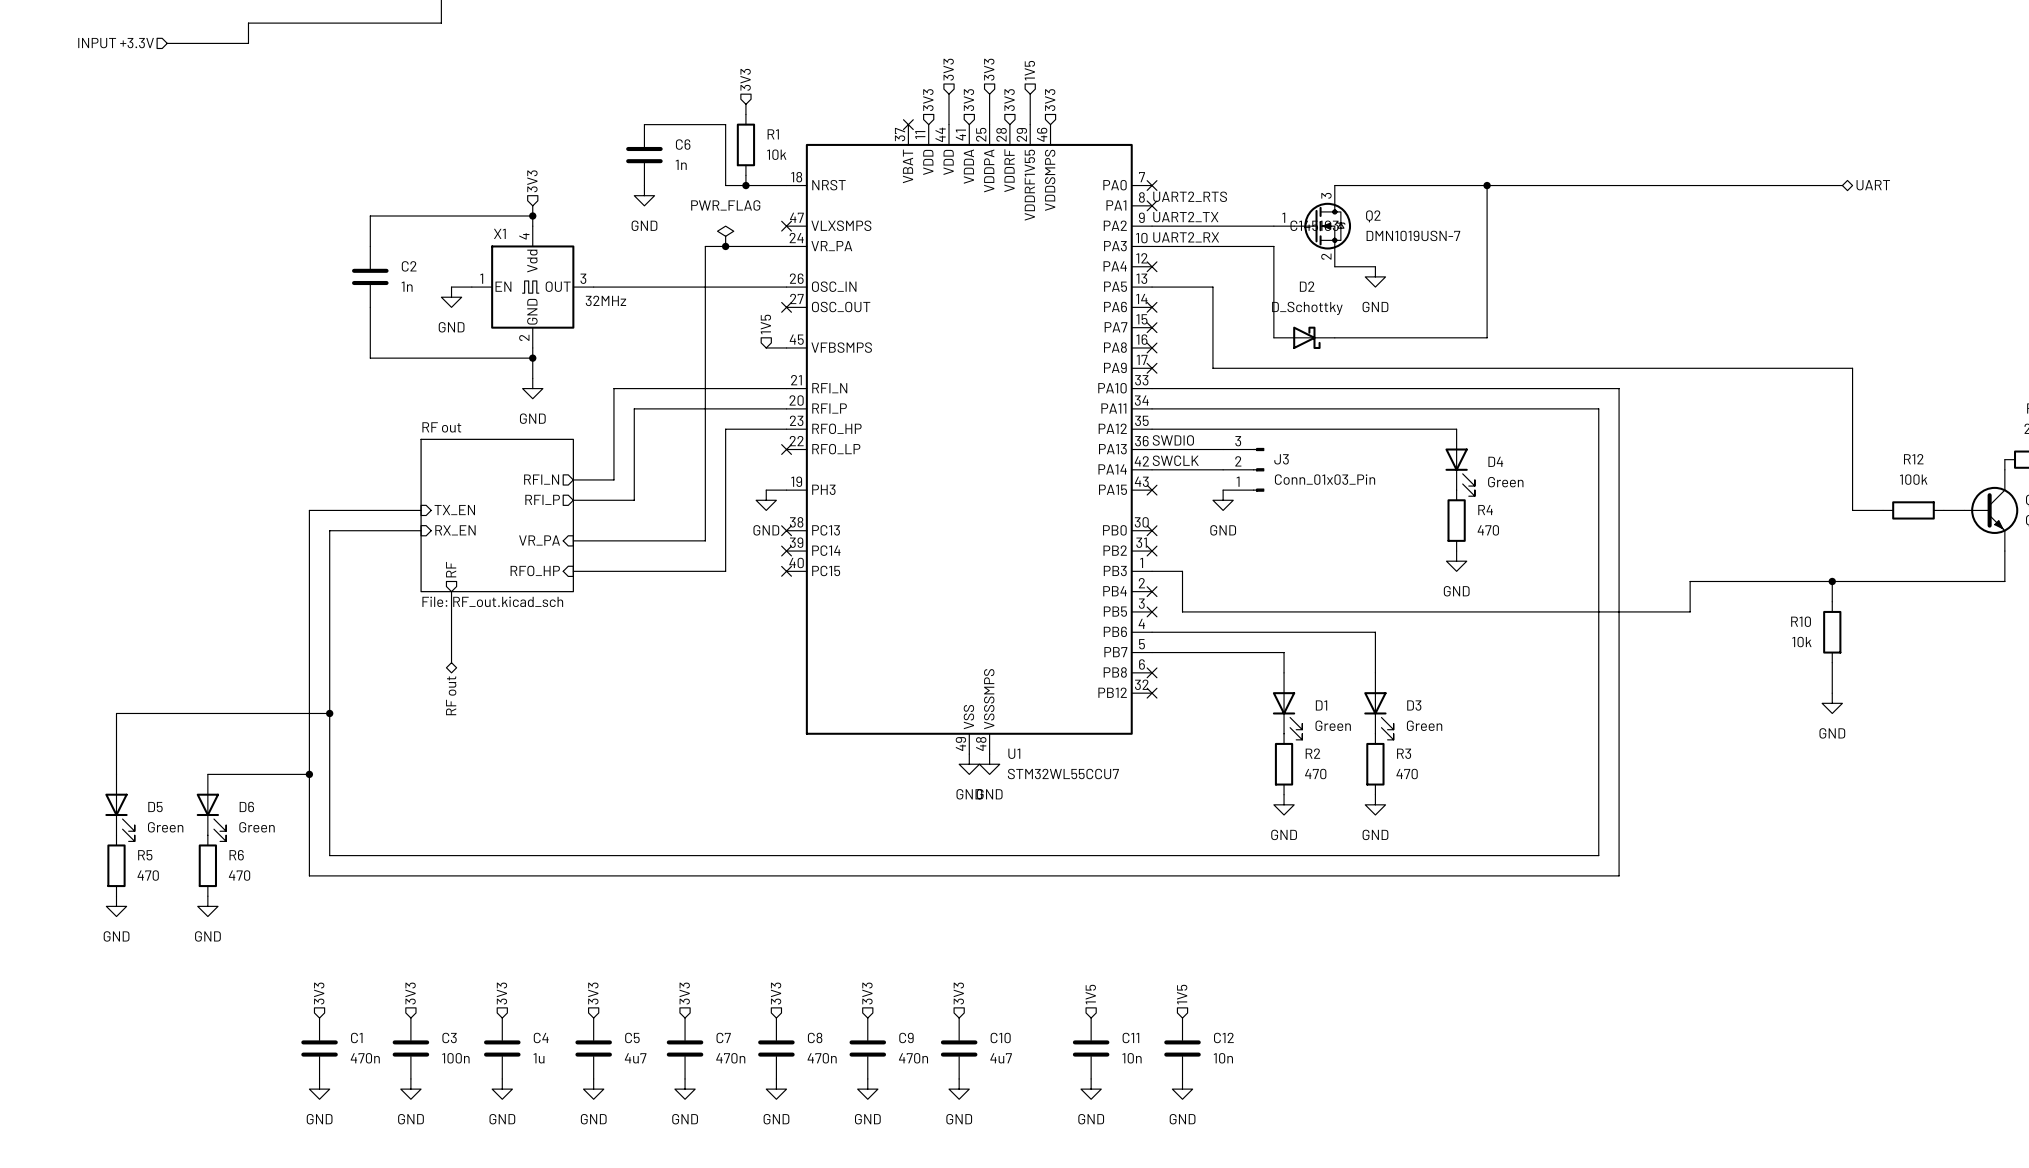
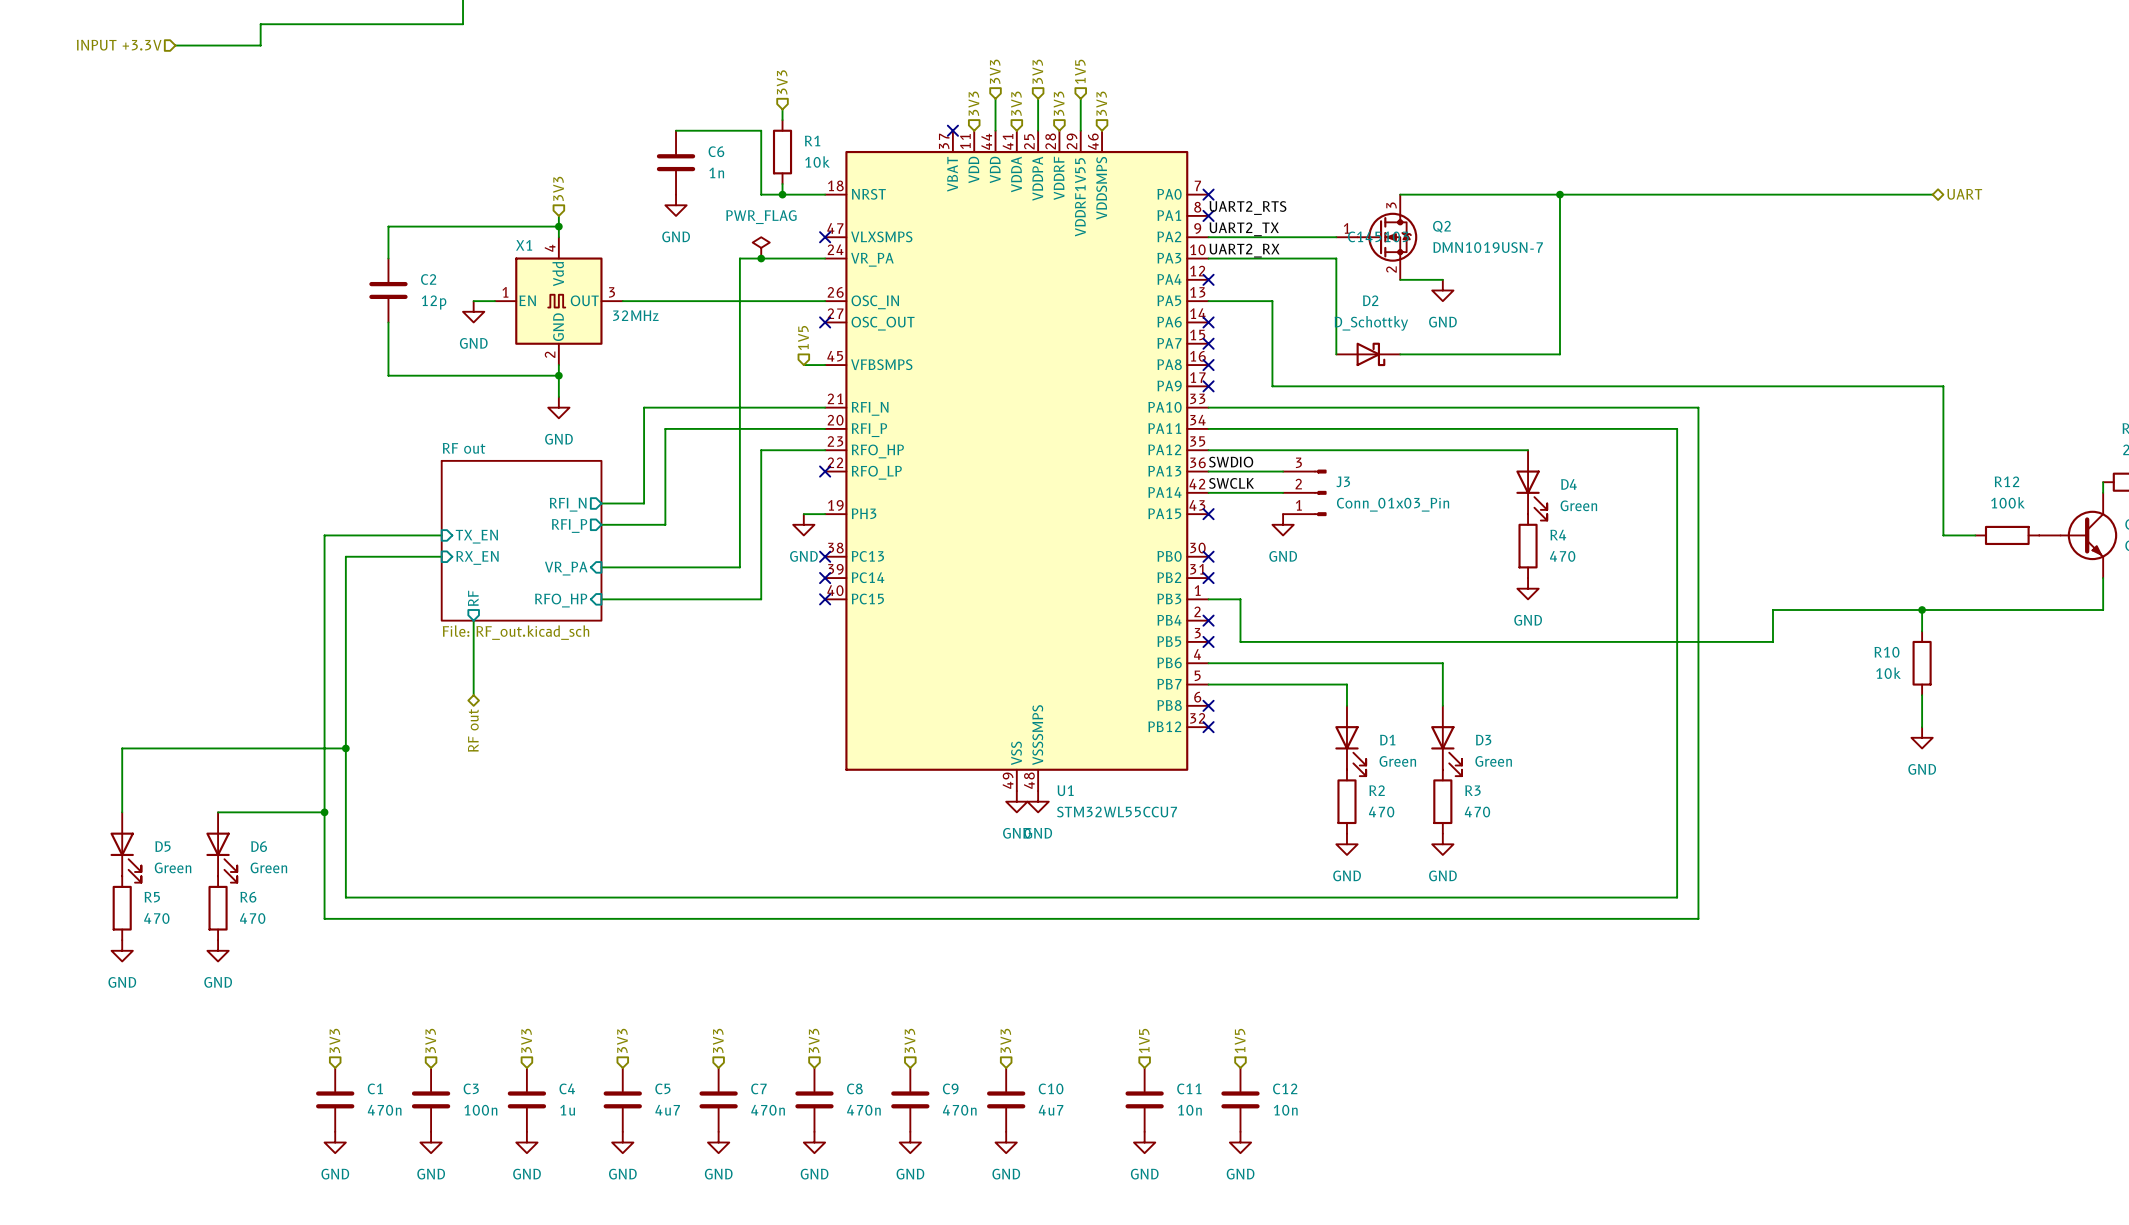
C2 value: 1n (407, 286) -> 12p (434, 302)

